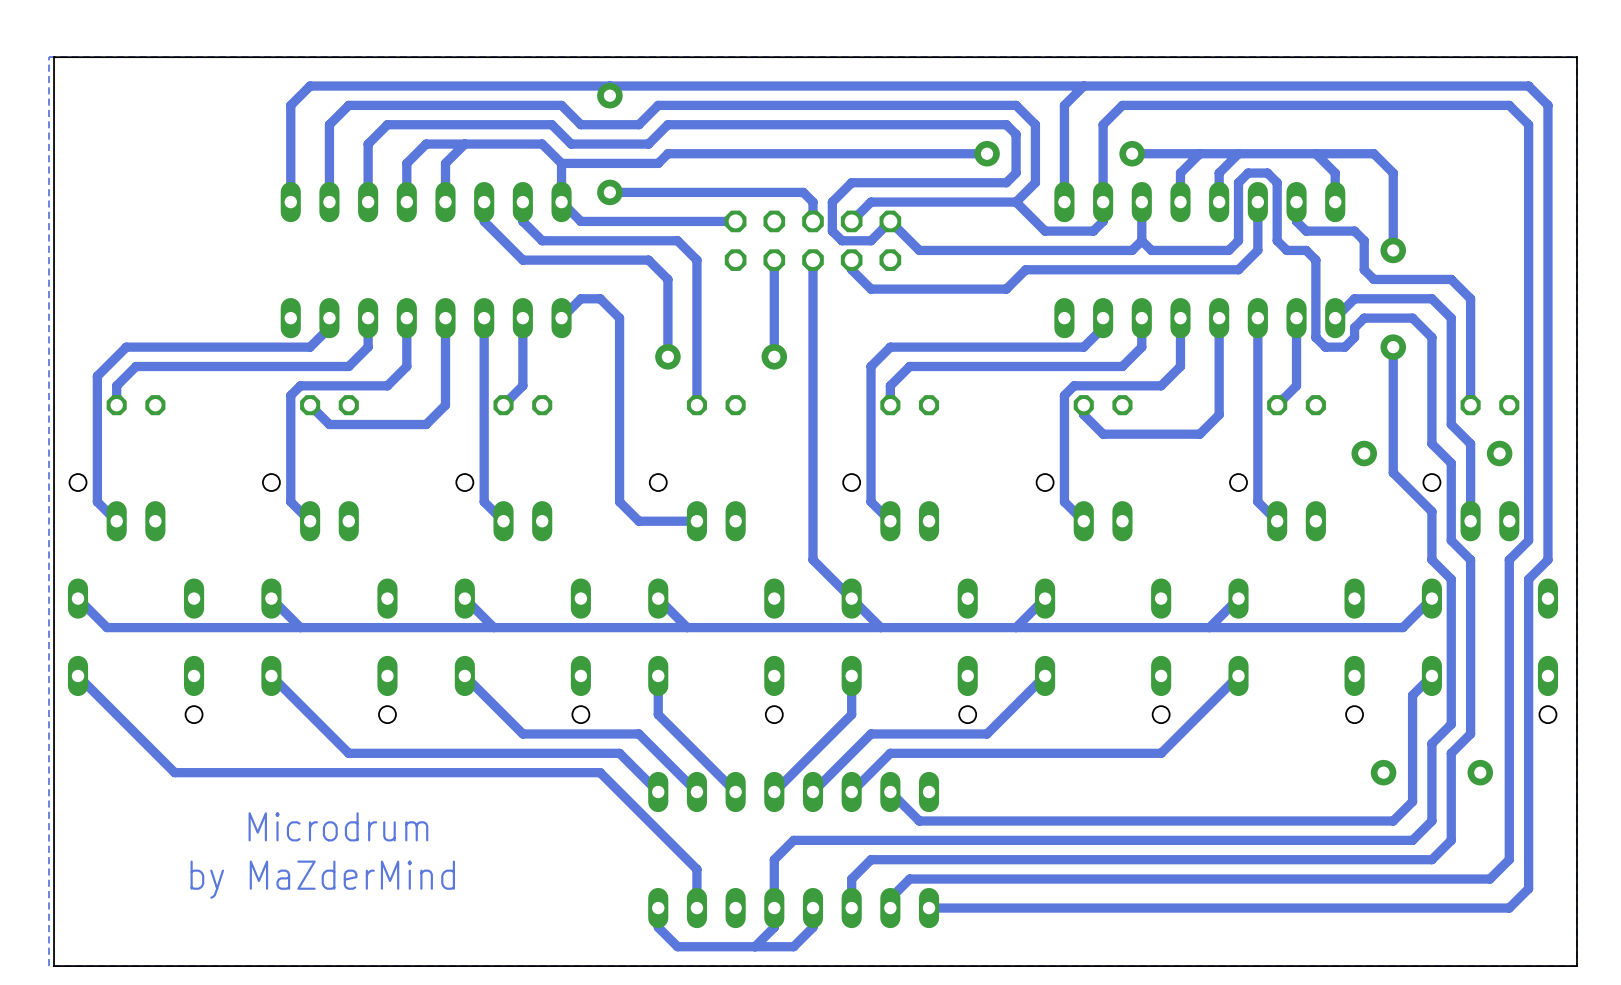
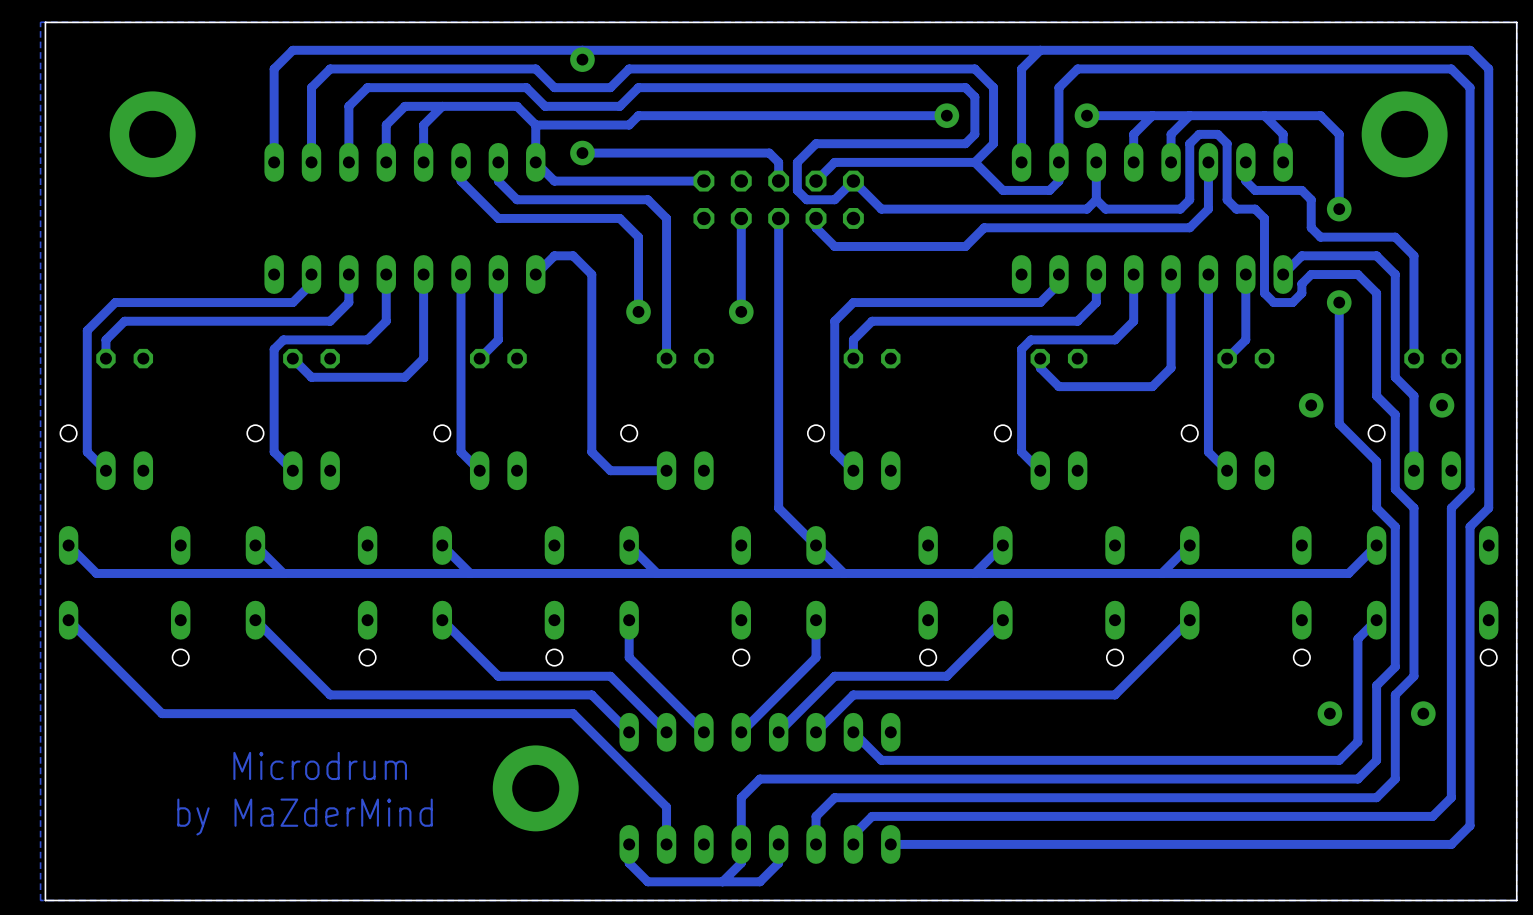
part: none -> (152, 134)
part: none -> (1404, 134)
part: none -> (535, 788)

